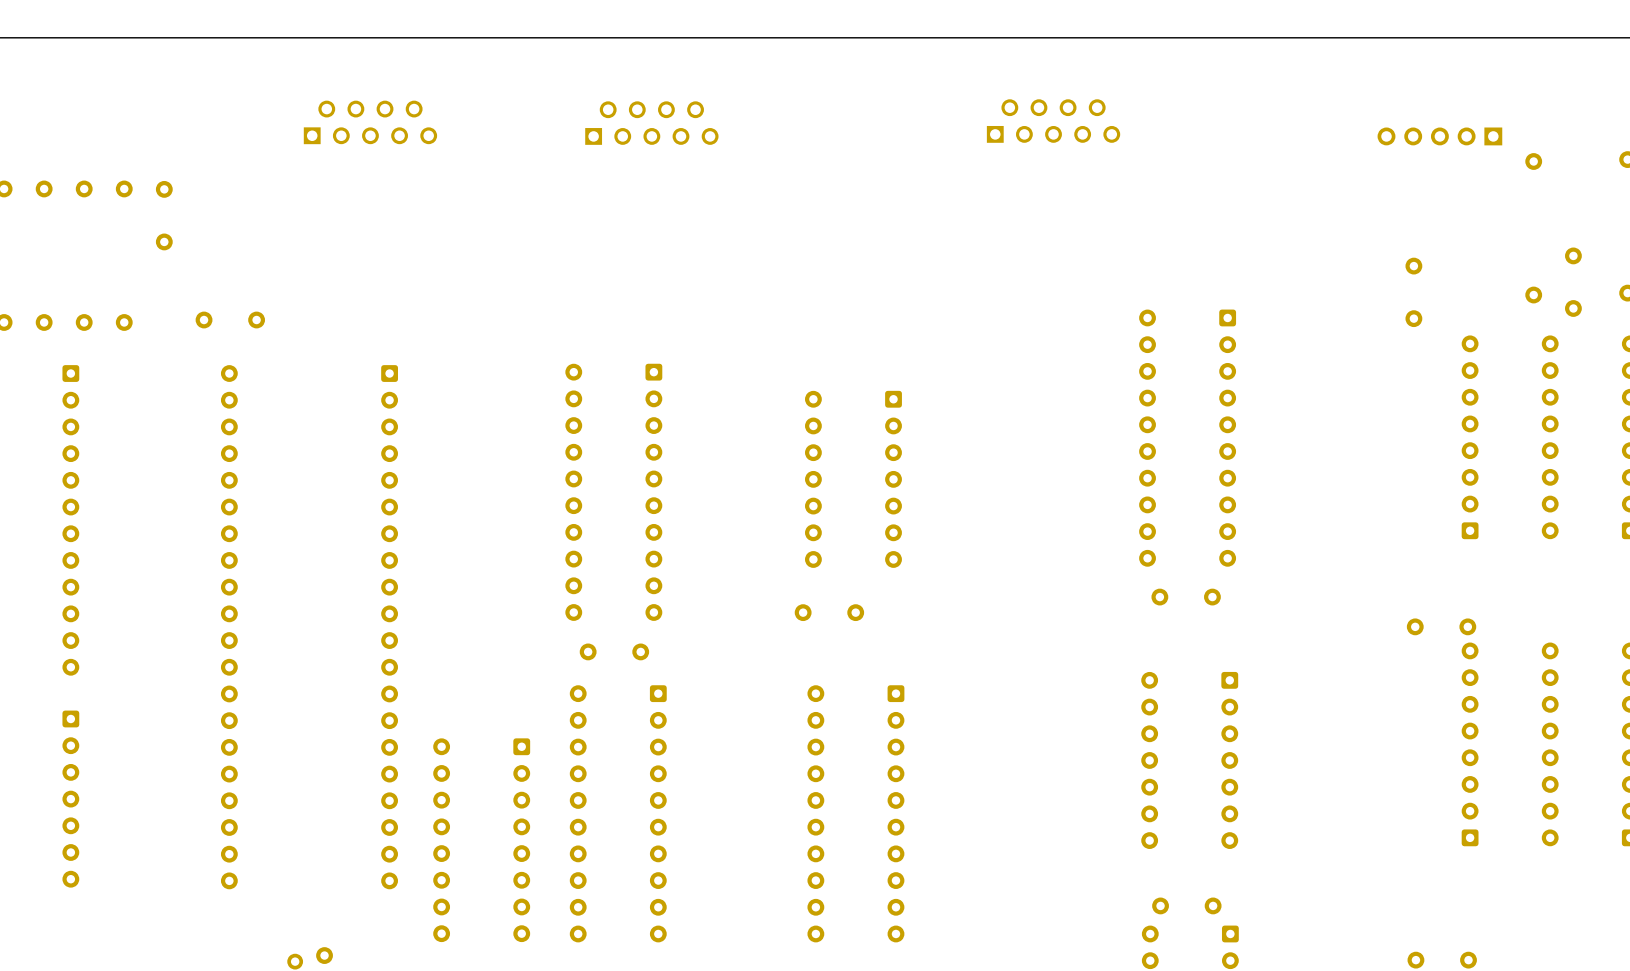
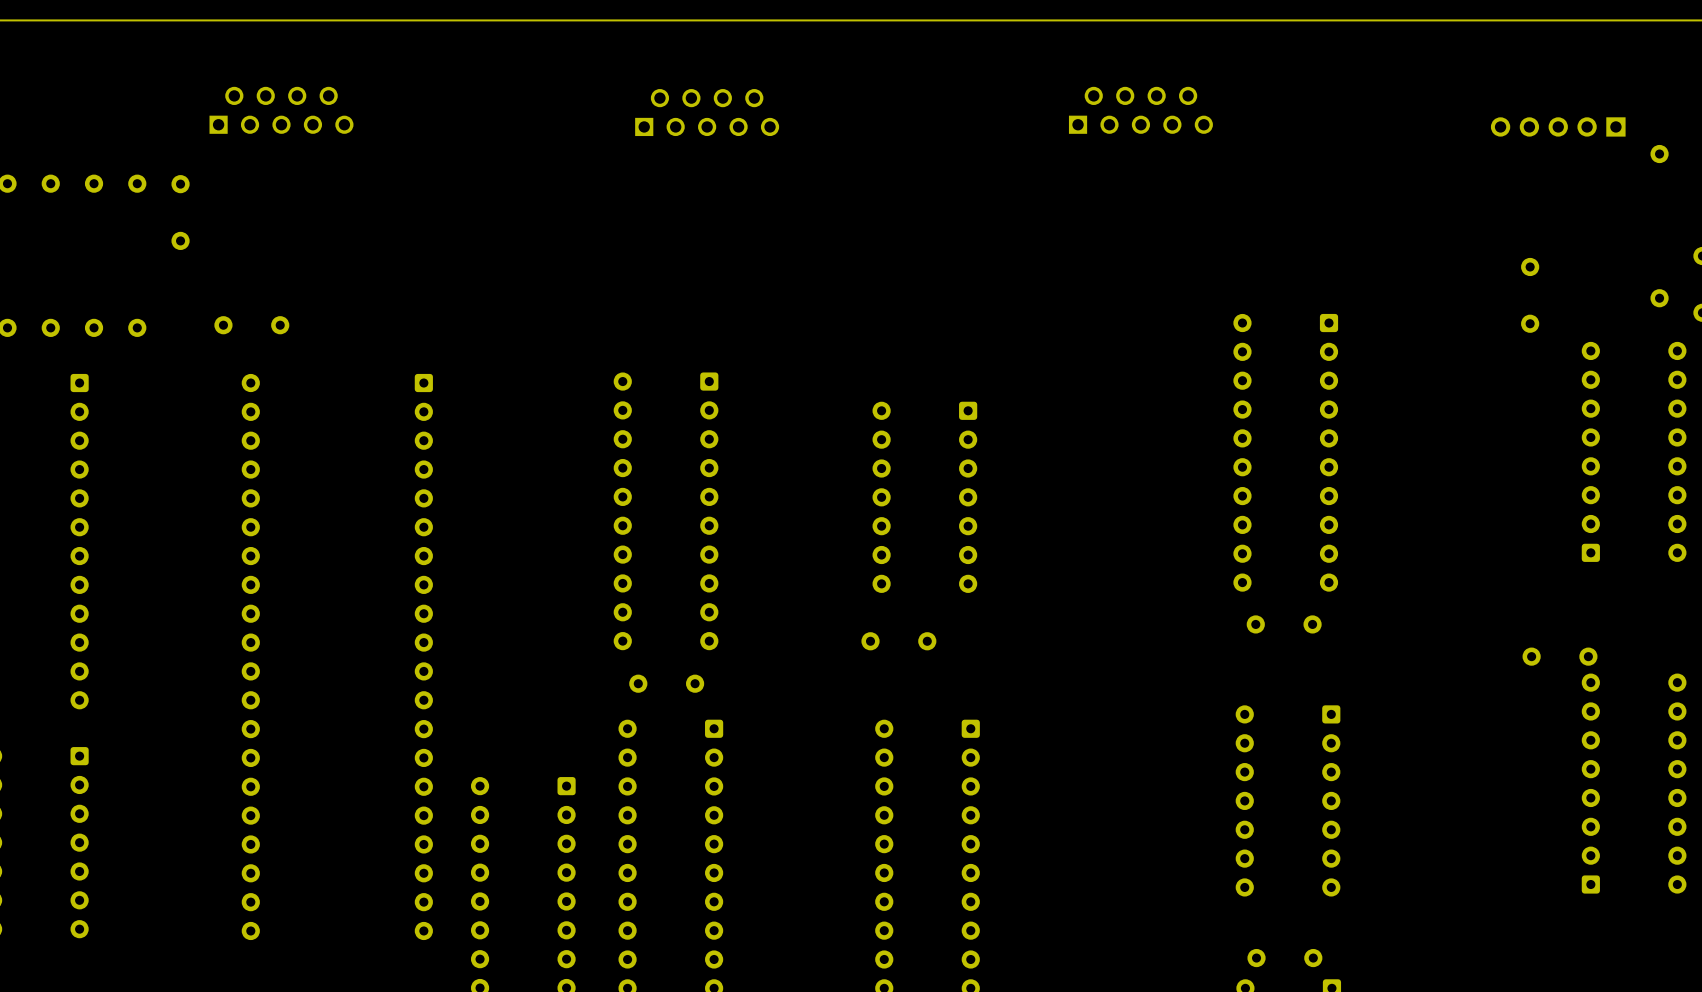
part position: (370, 122) -> (281, 110)

